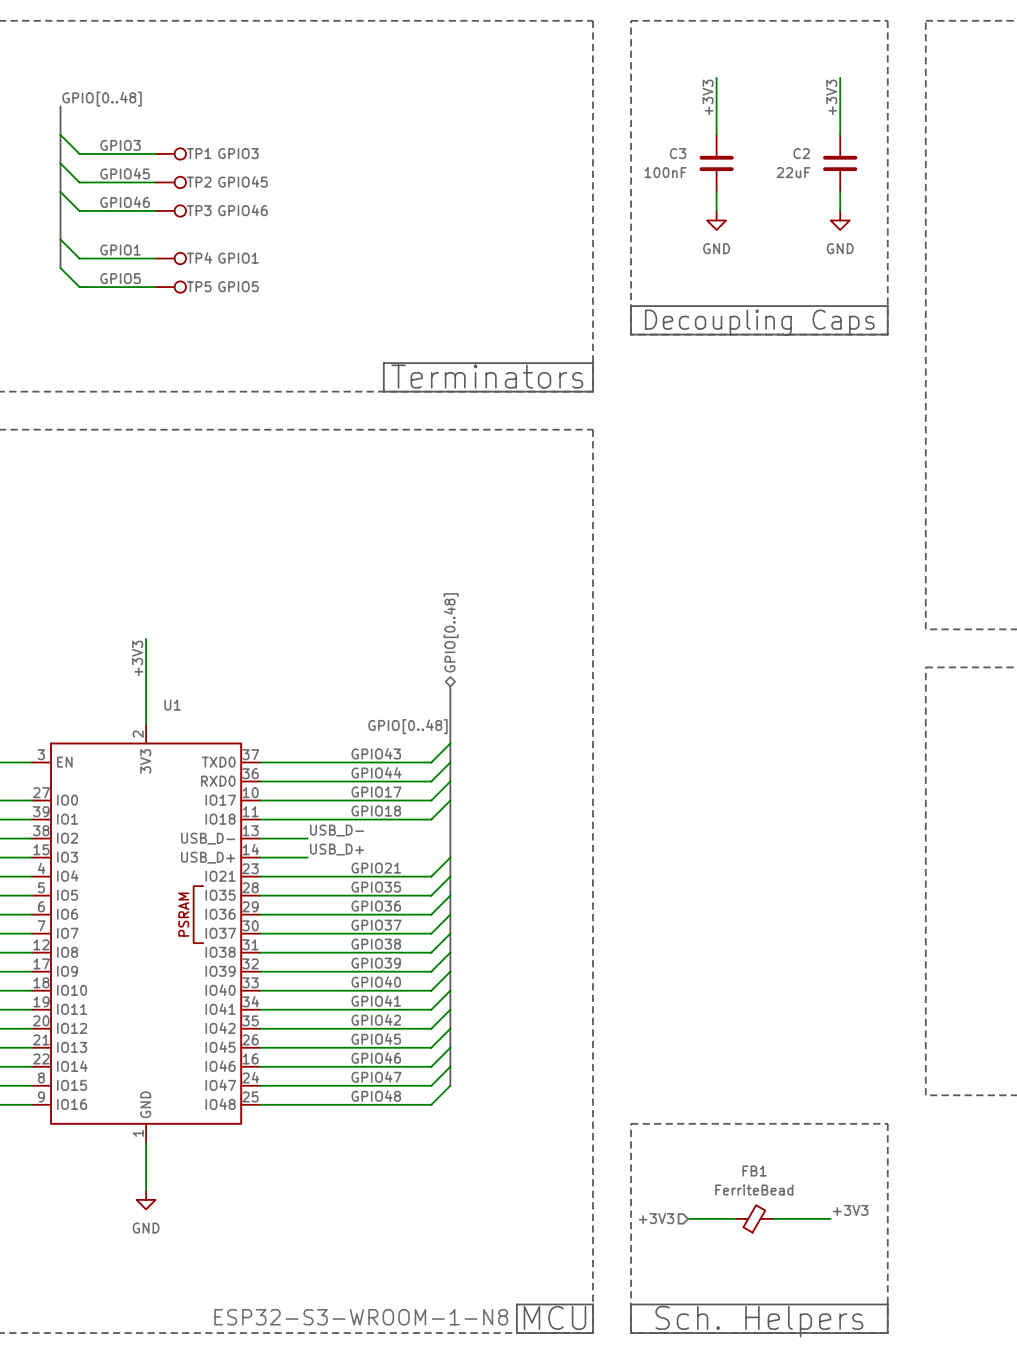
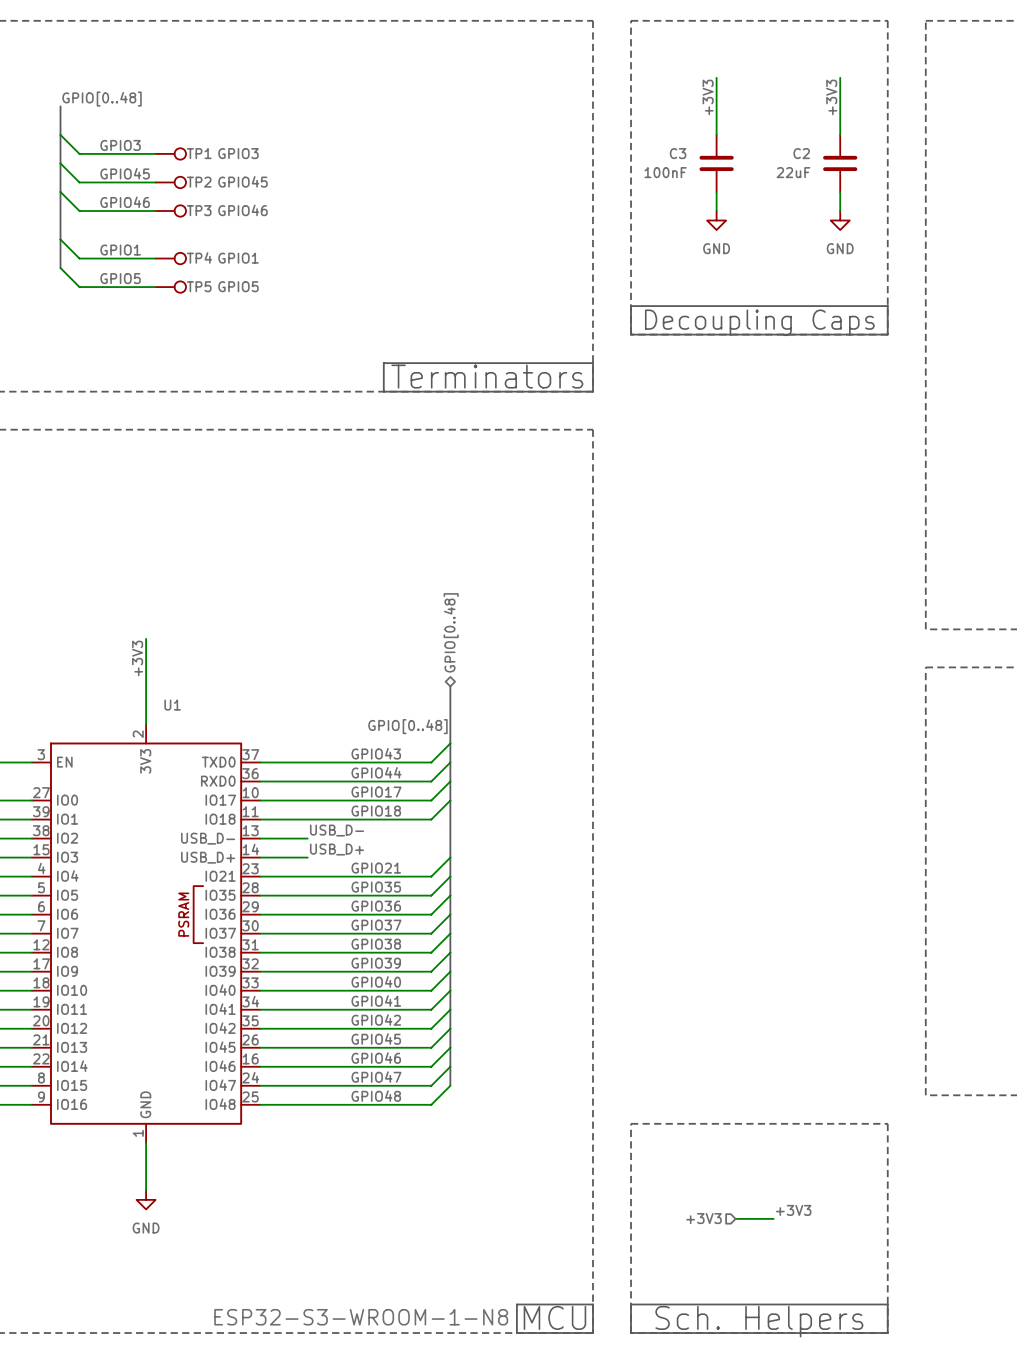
label position: +3V3 (850, 1210) -> +3V3 (793, 1210)
hierarchical label position: +3V3 (656, 1218) -> +3V3 (704, 1218)
FB1: FerriteBead (754, 1218) -> none
wire: (773, 1218) (830, 1218) -> none

